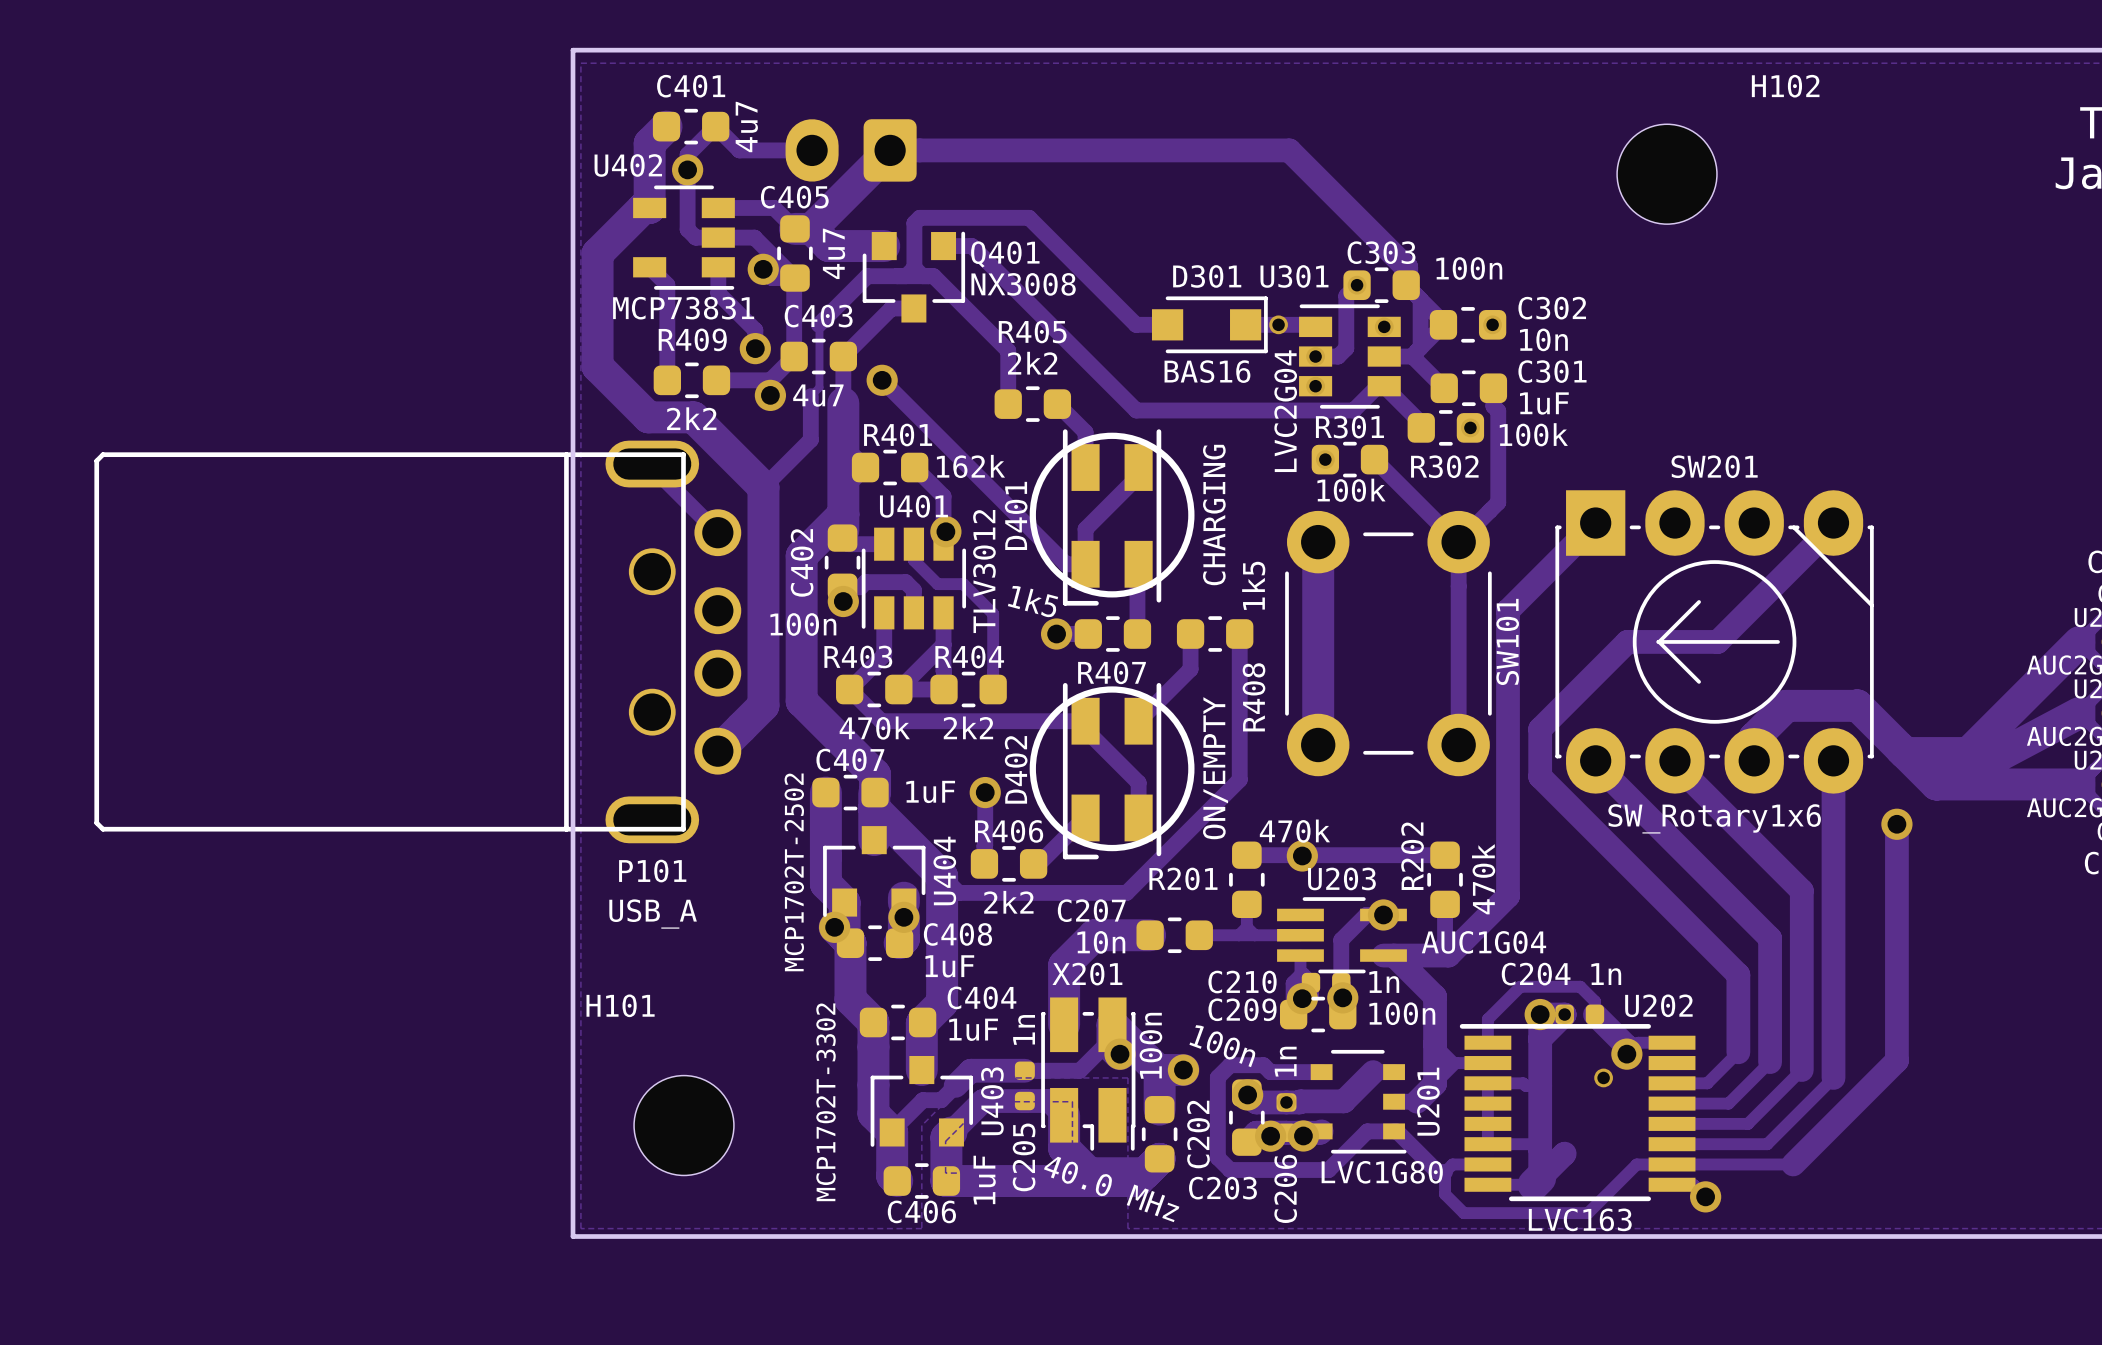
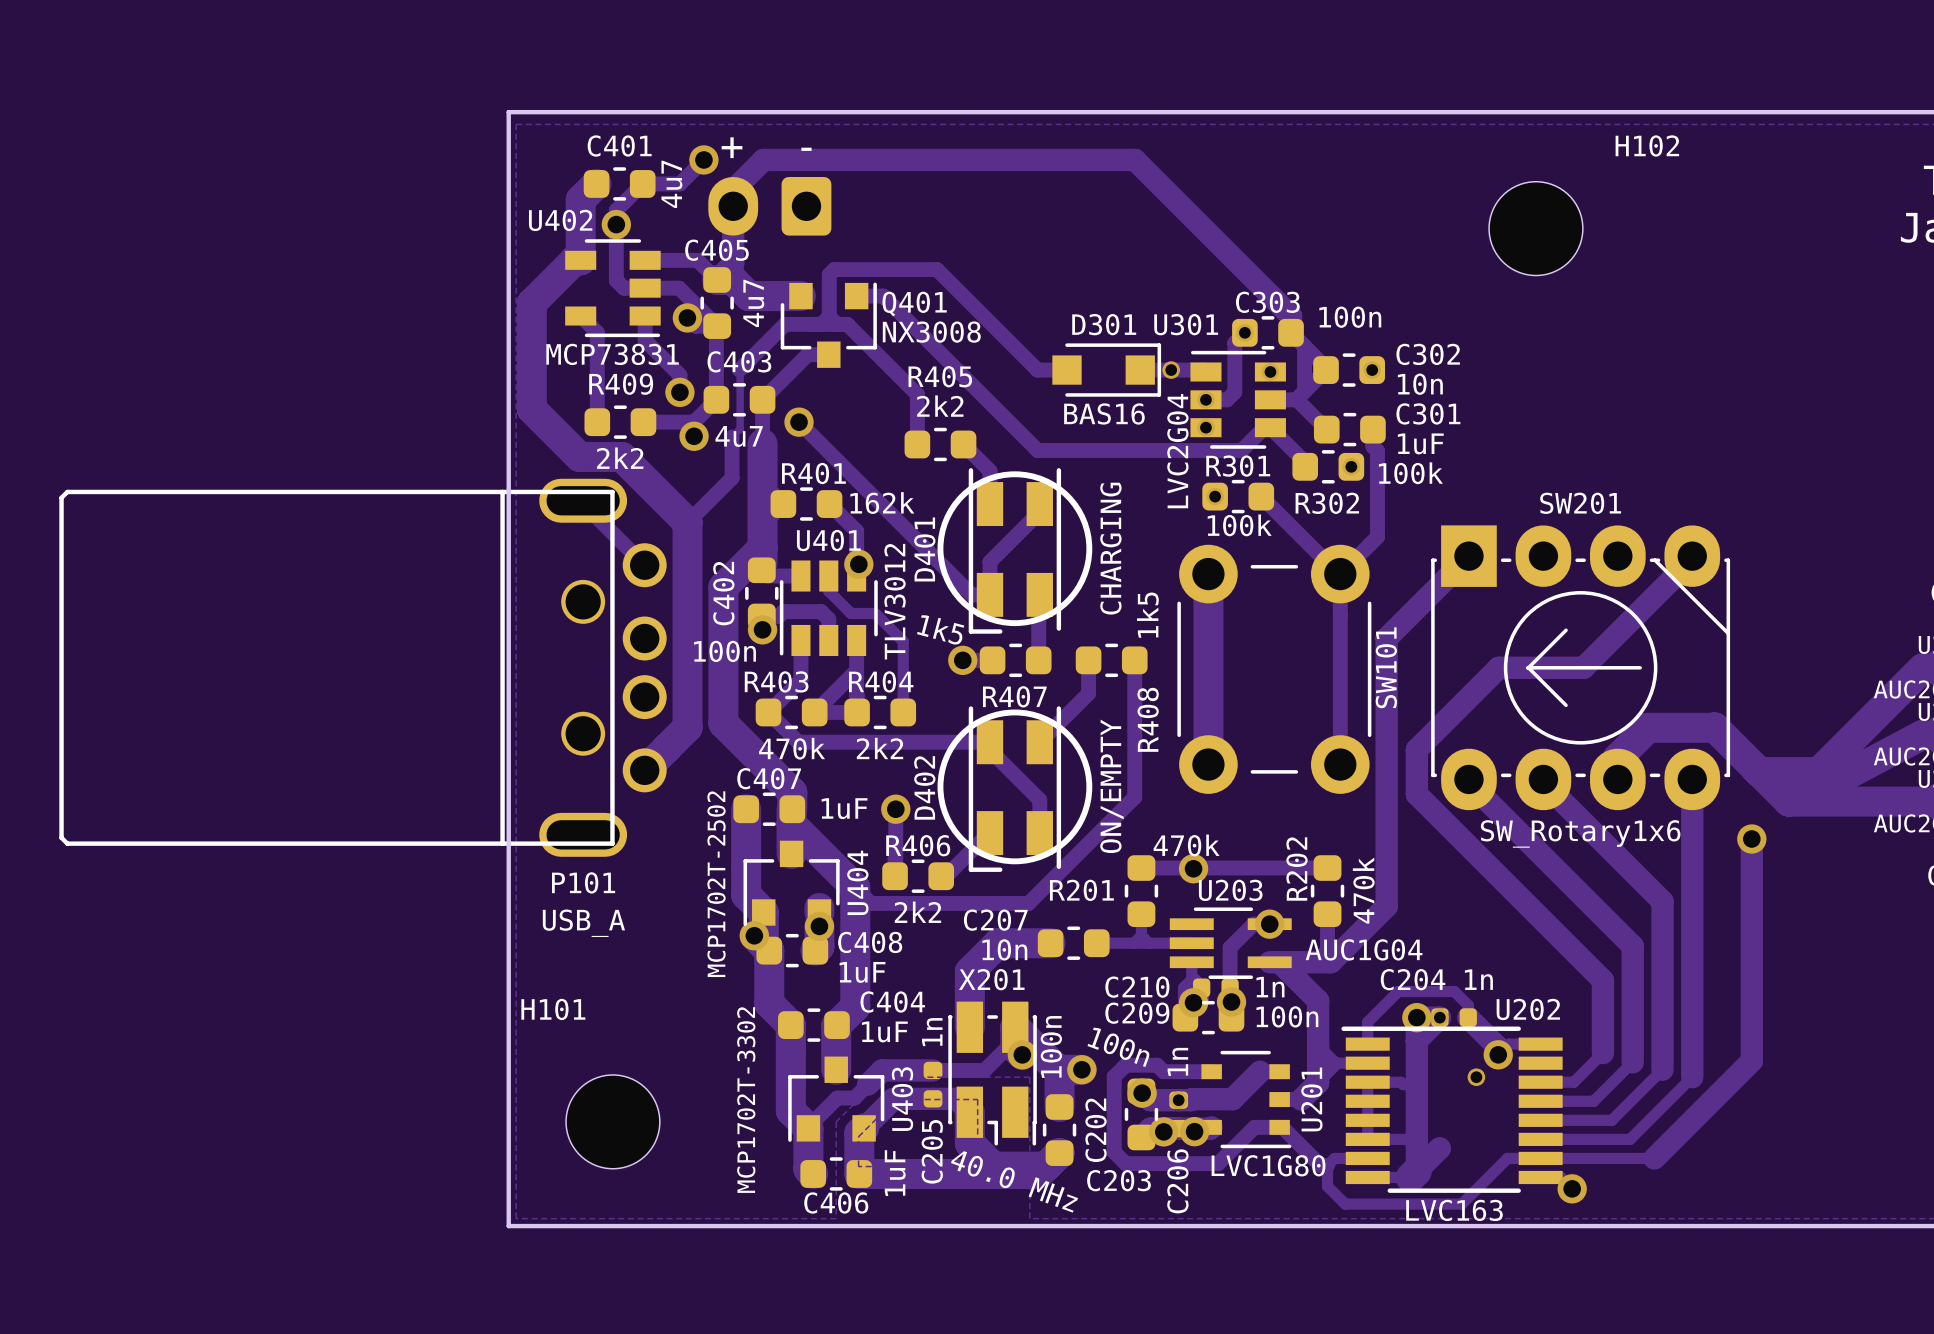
text: none -> + (732, 147)
text: none -> - (806, 149)
via: none -> (703, 159)
track: (715, 126) (739, 150) (812, 150) -> (642, 183) (679, 183) (703, 159)
track: (1289, 150) (890, 150) (811, 228) -> (1181, 206) (1135, 159) (763, 159) (733, 190) (733, 263) (717, 279)

